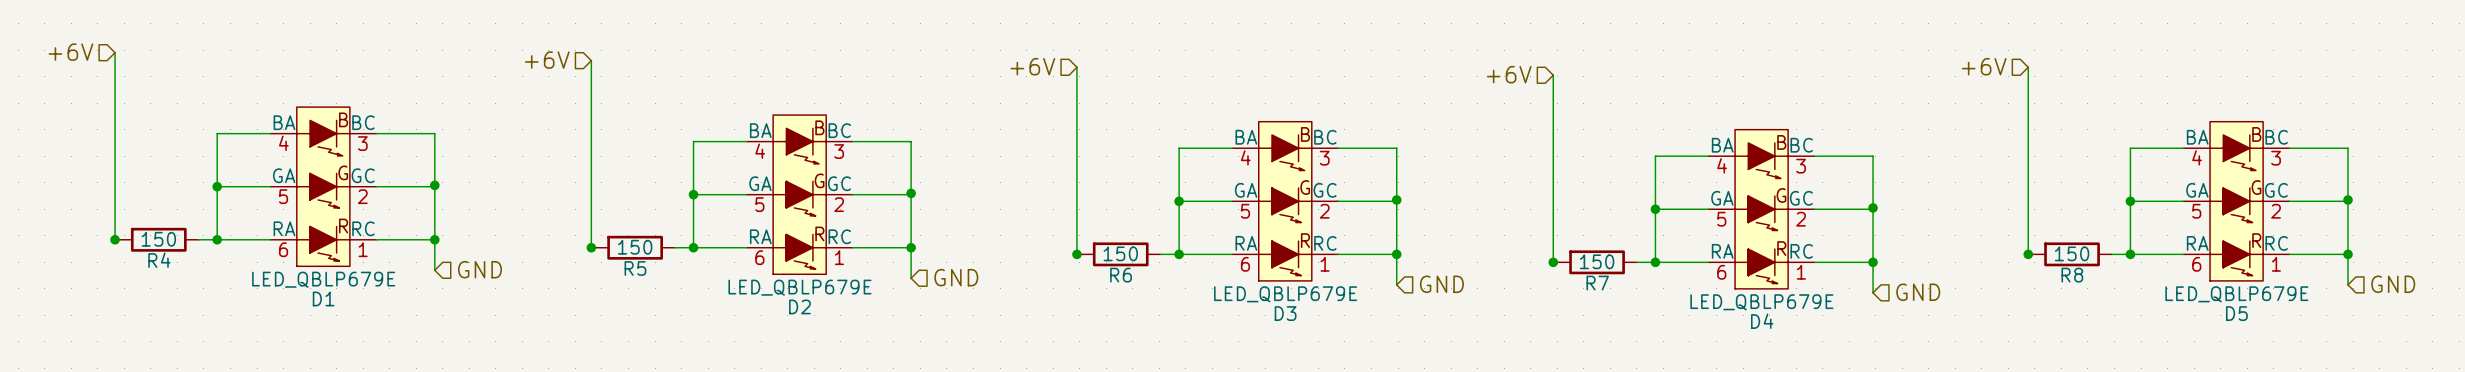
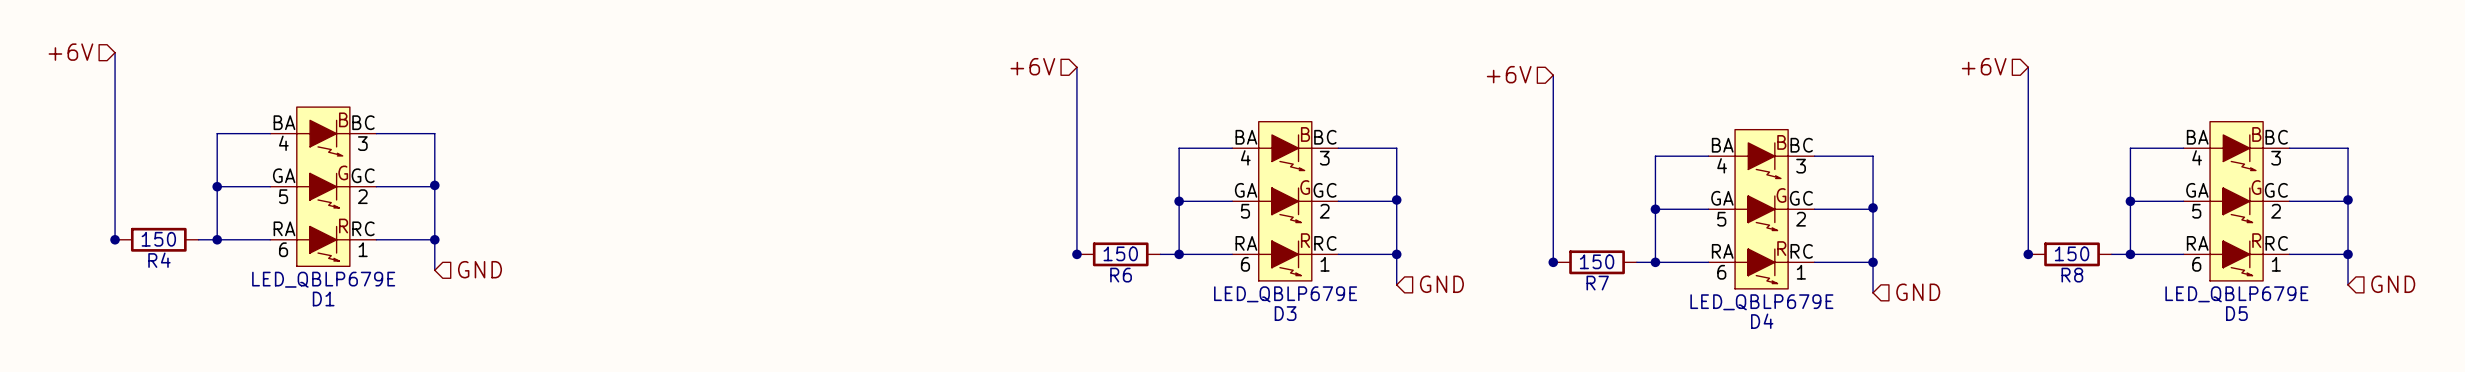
hierarchical label: +6V (547, 60) -> none
wire: (591, 60) (591, 247) -> none
wire: (746, 141) (693, 141) (693, 247) -> none
wire: (852, 141) (911, 141) (911, 278) -> none
junction: (911, 193) -> none
wire: (693, 194) (746, 194) -> none
junction: (693, 194) -> none
D2: LED_QBLP679E (799, 194) -> none
wire: (852, 194) (911, 194) -> none
junction: (591, 247) -> none
R5: 150 (635, 247) -> none
wire: (674, 247) (746, 247) -> none
junction: (693, 247) -> none
wire: (852, 247) (911, 247) -> none
junction: (911, 247) -> none
hierarchical label: GND (956, 277) -> none

